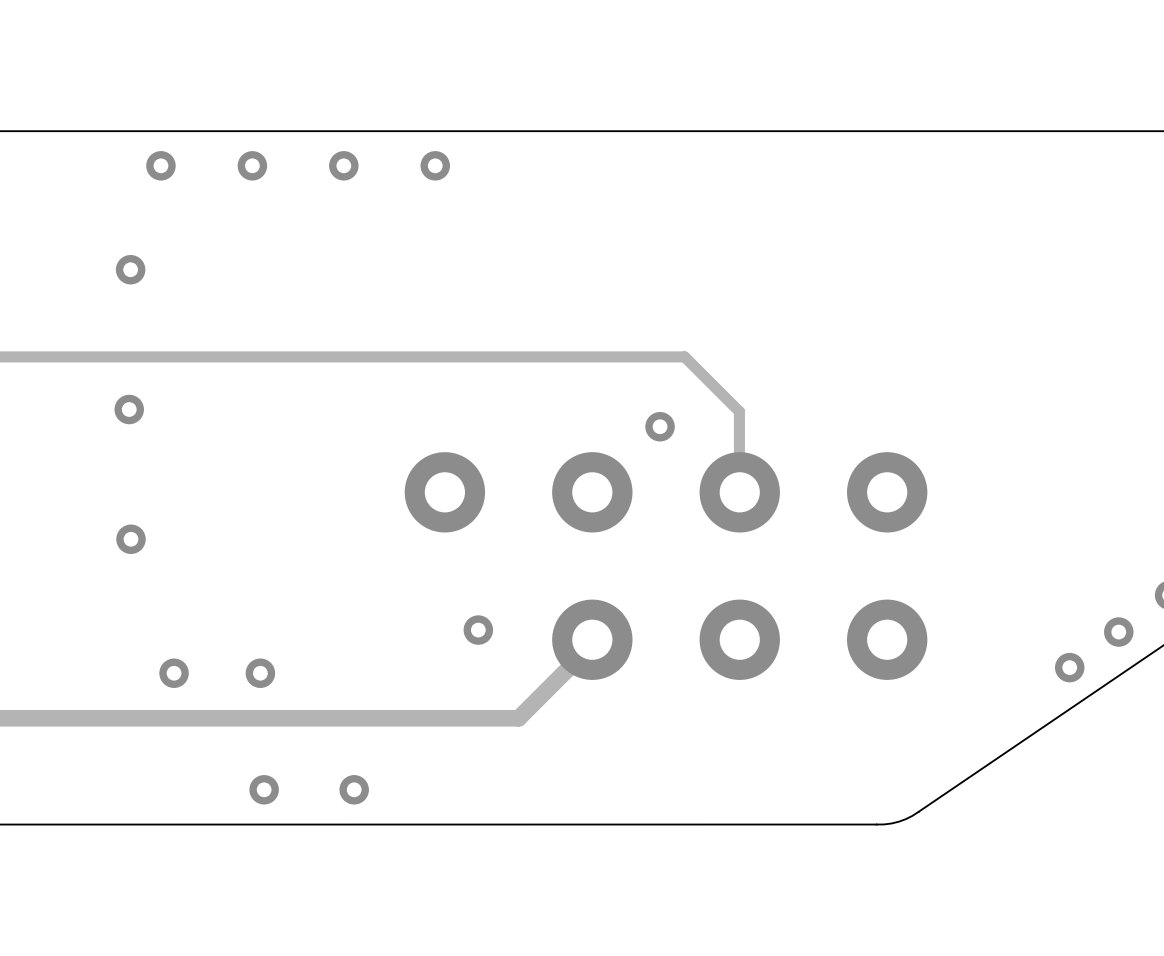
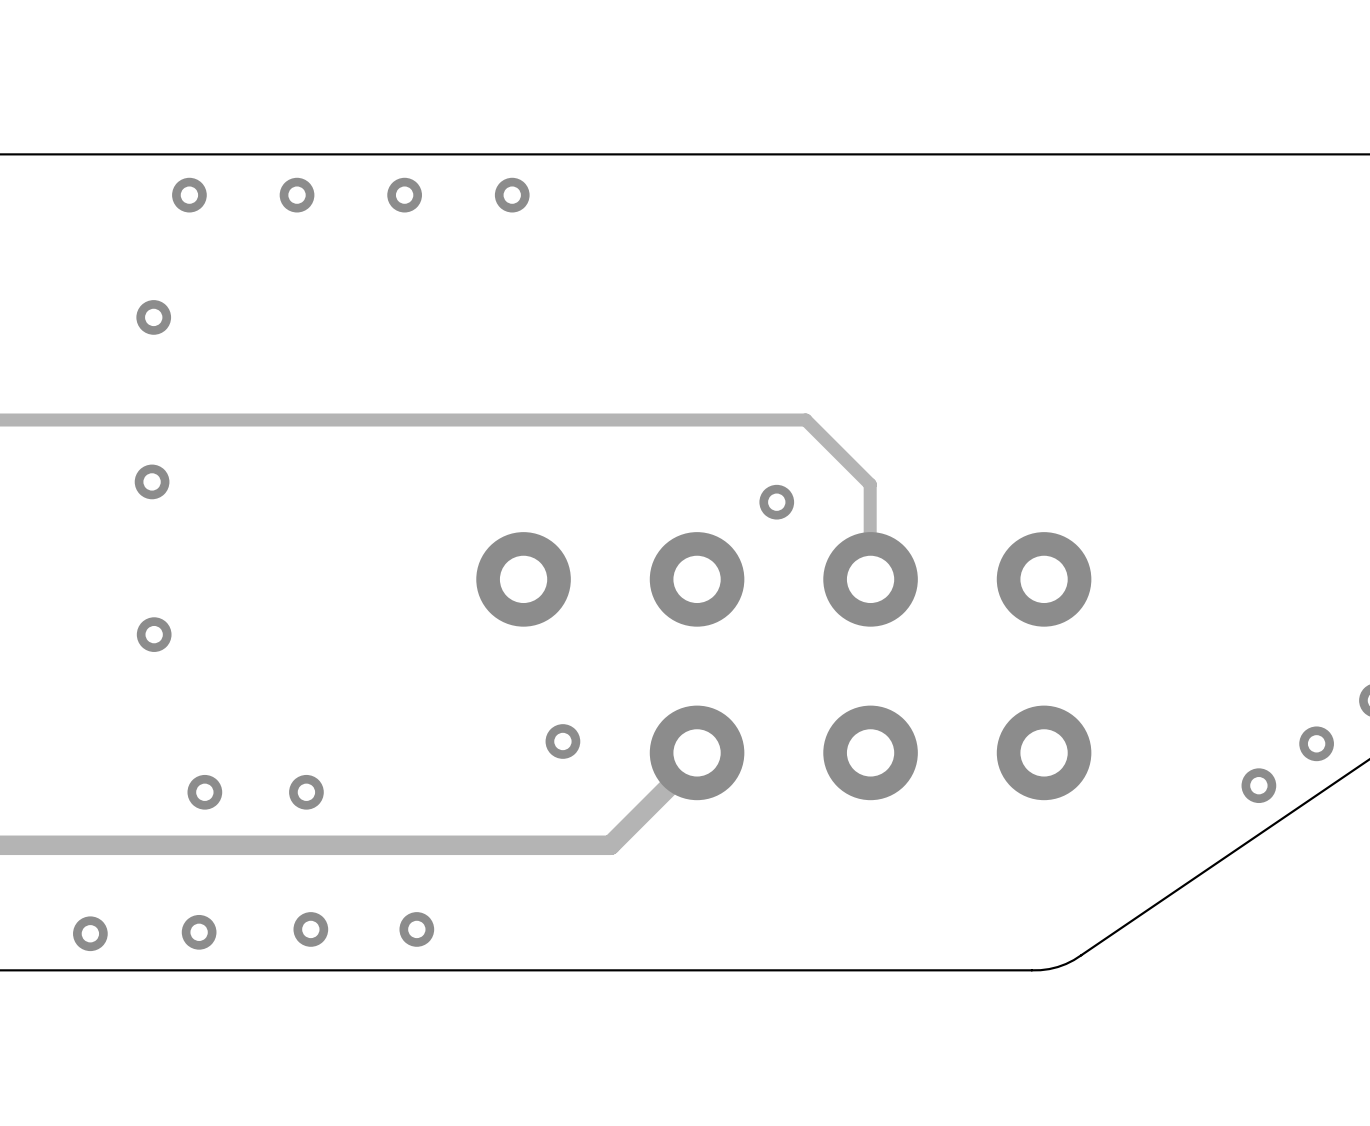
via: none -> (199, 932)
via: none -> (90, 933)

